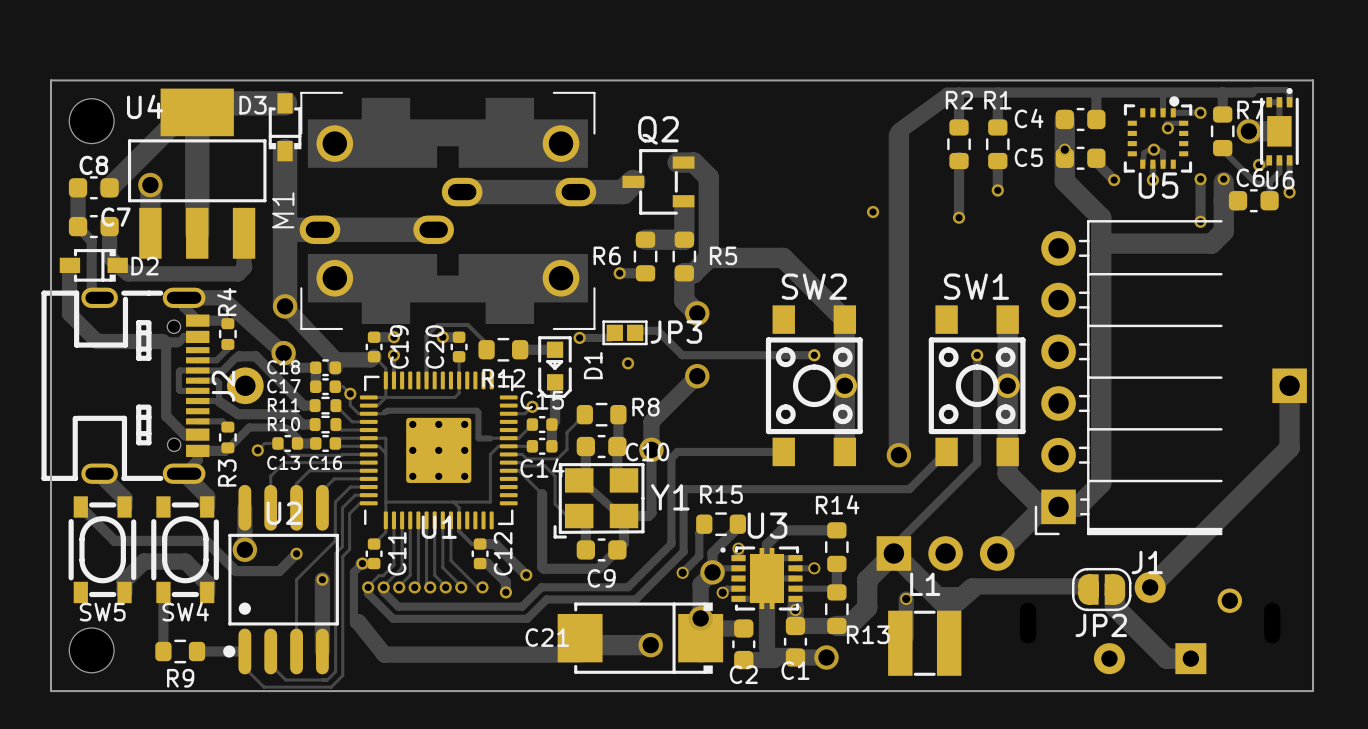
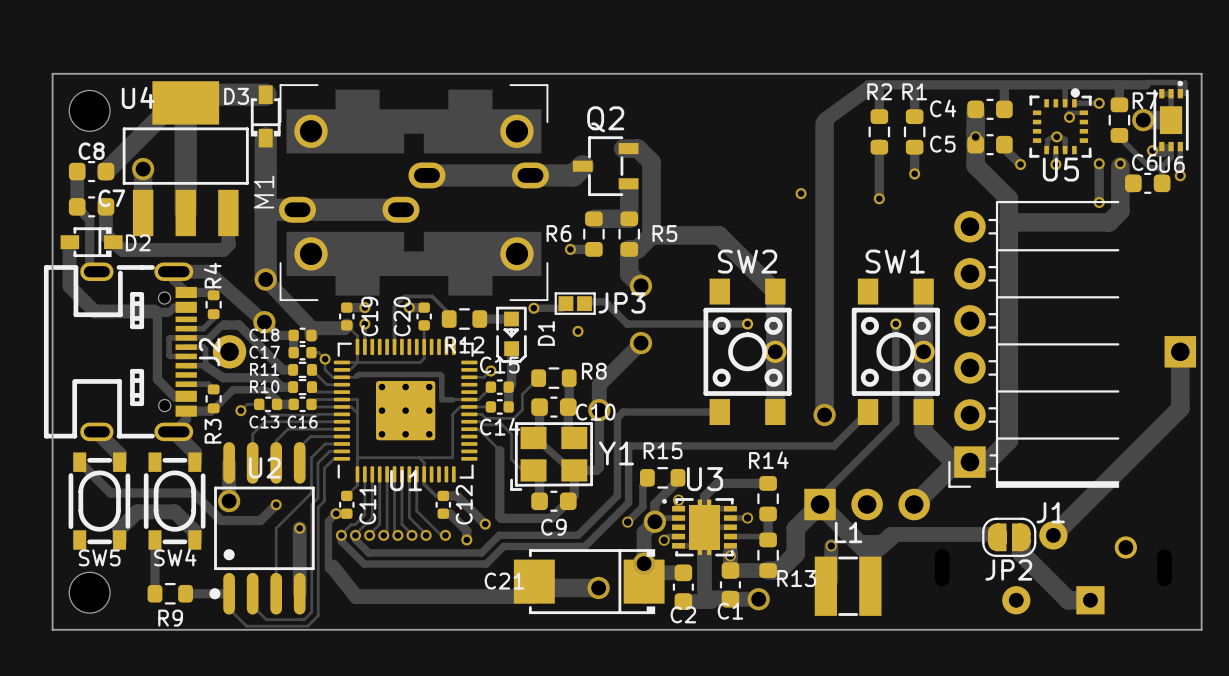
track: none -> (1184, 82) (1184, 93)
track: none -> (1166, 146) (1164, 154) (1153, 154)

